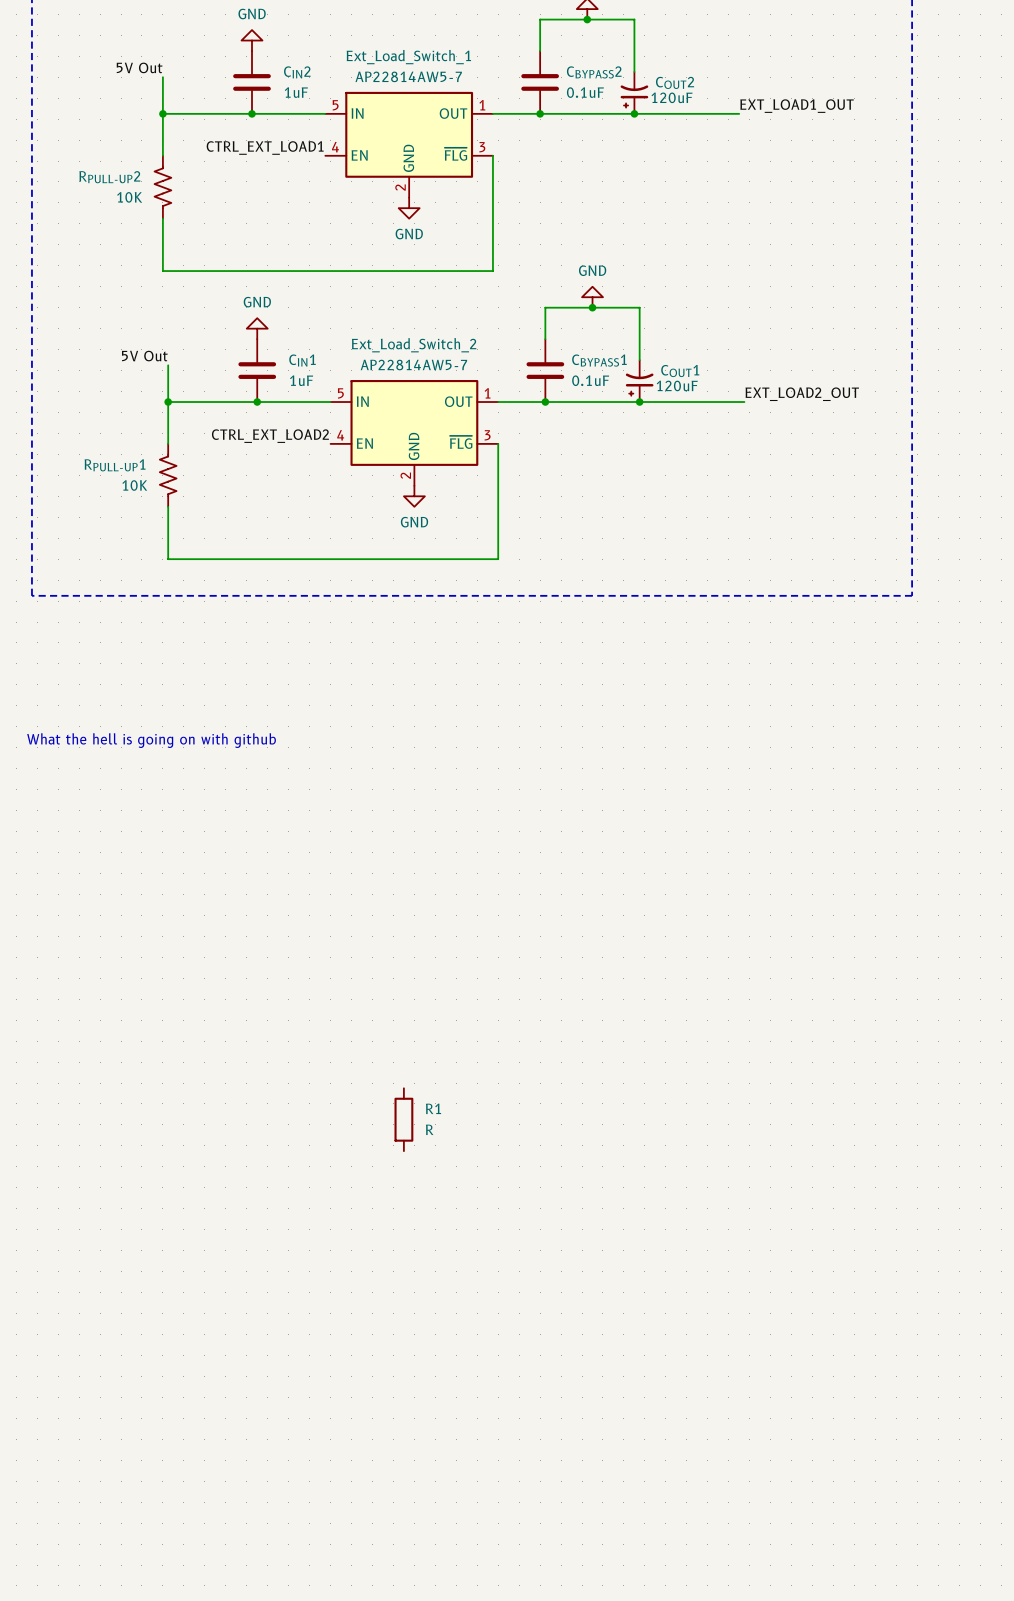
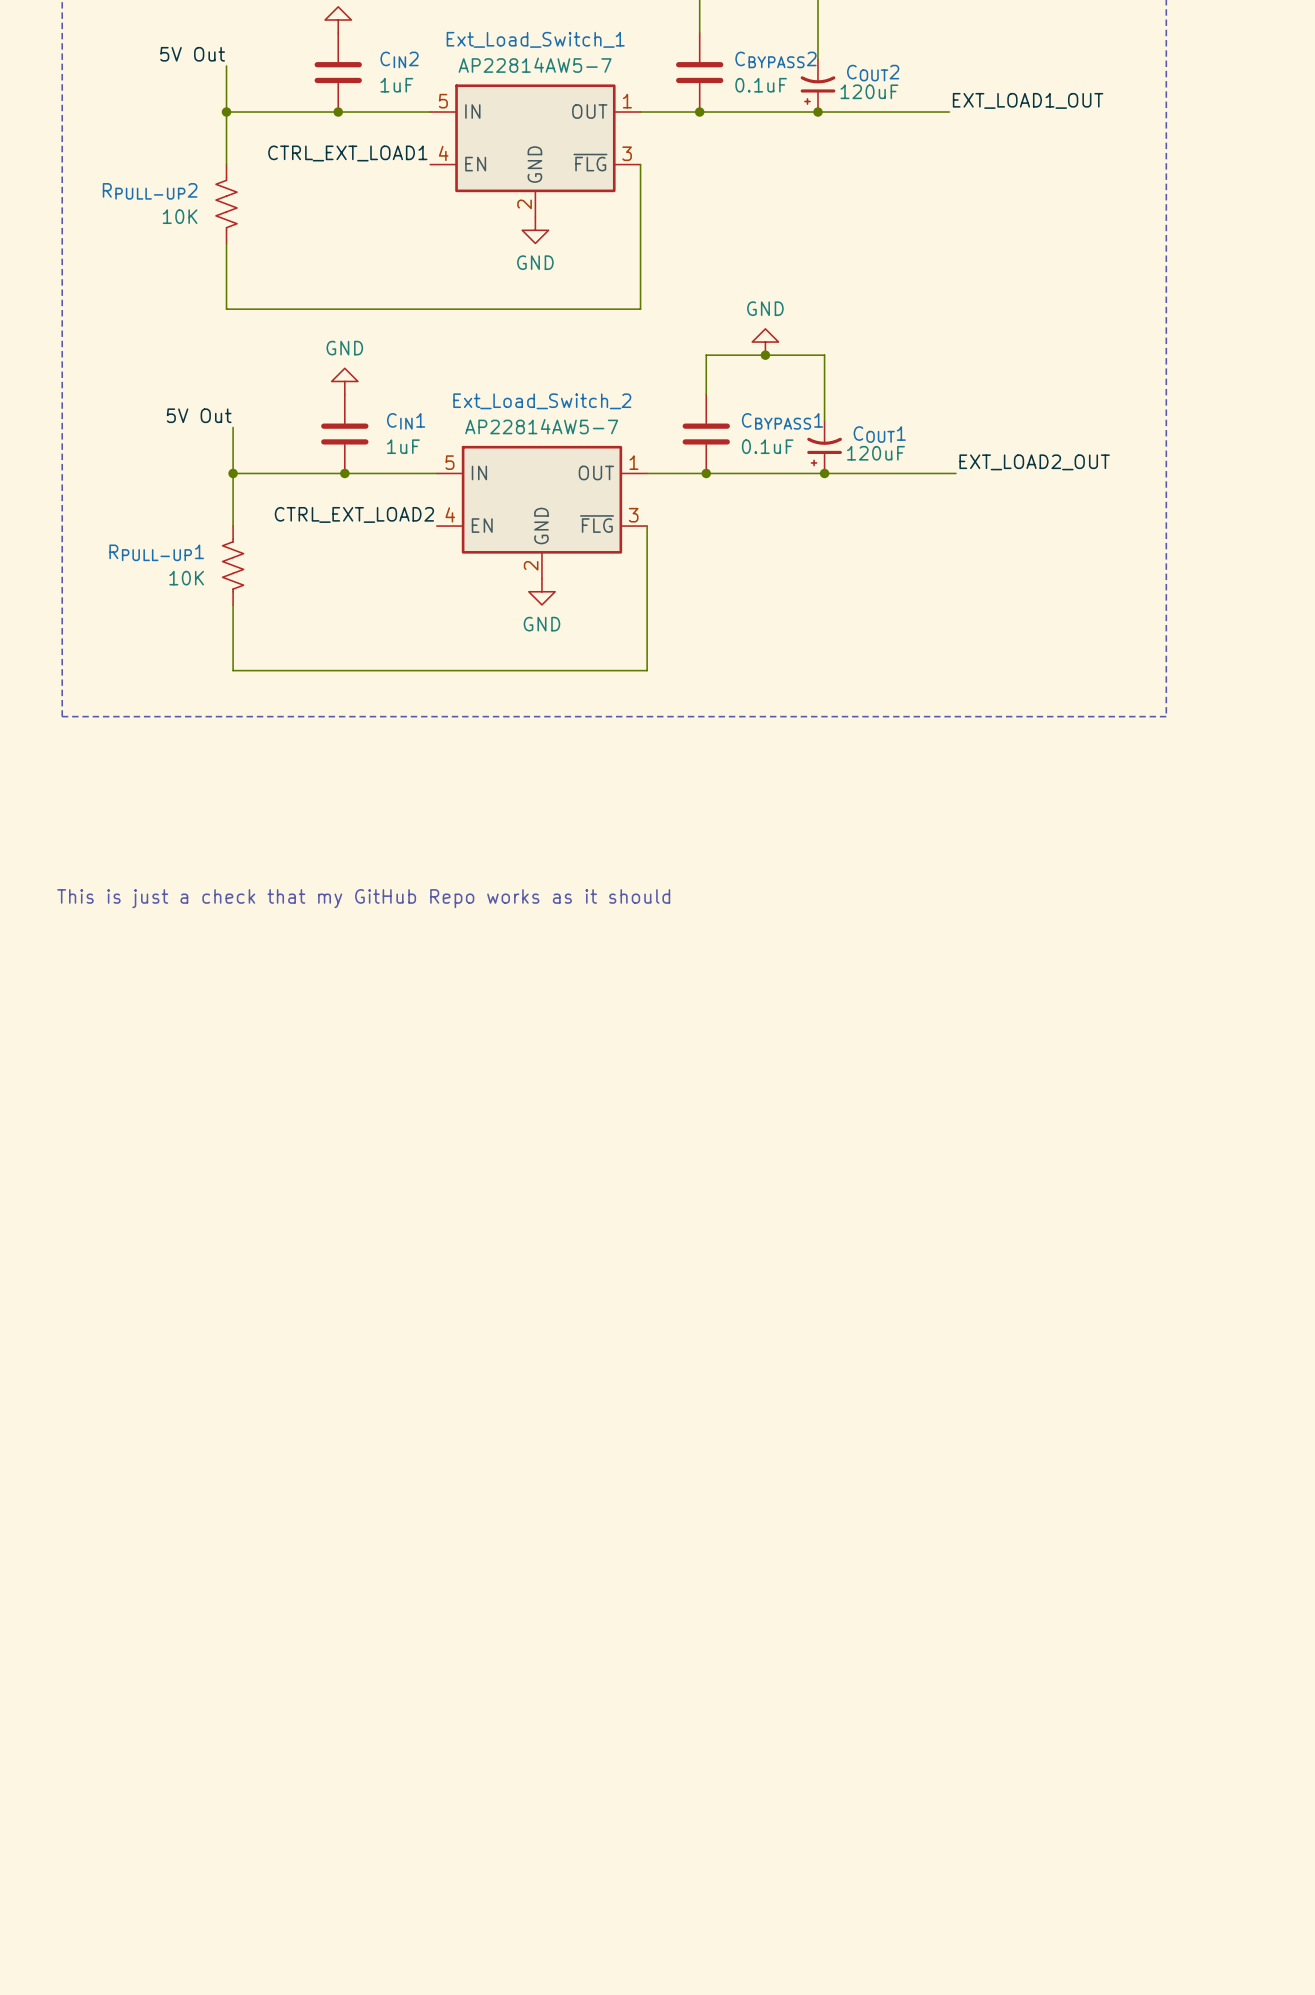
text: What the hell is going on with github (151, 740) -> This is just a check that my GitHub Repo works as it should (363, 898)
R1: R (403, 1119) -> none

